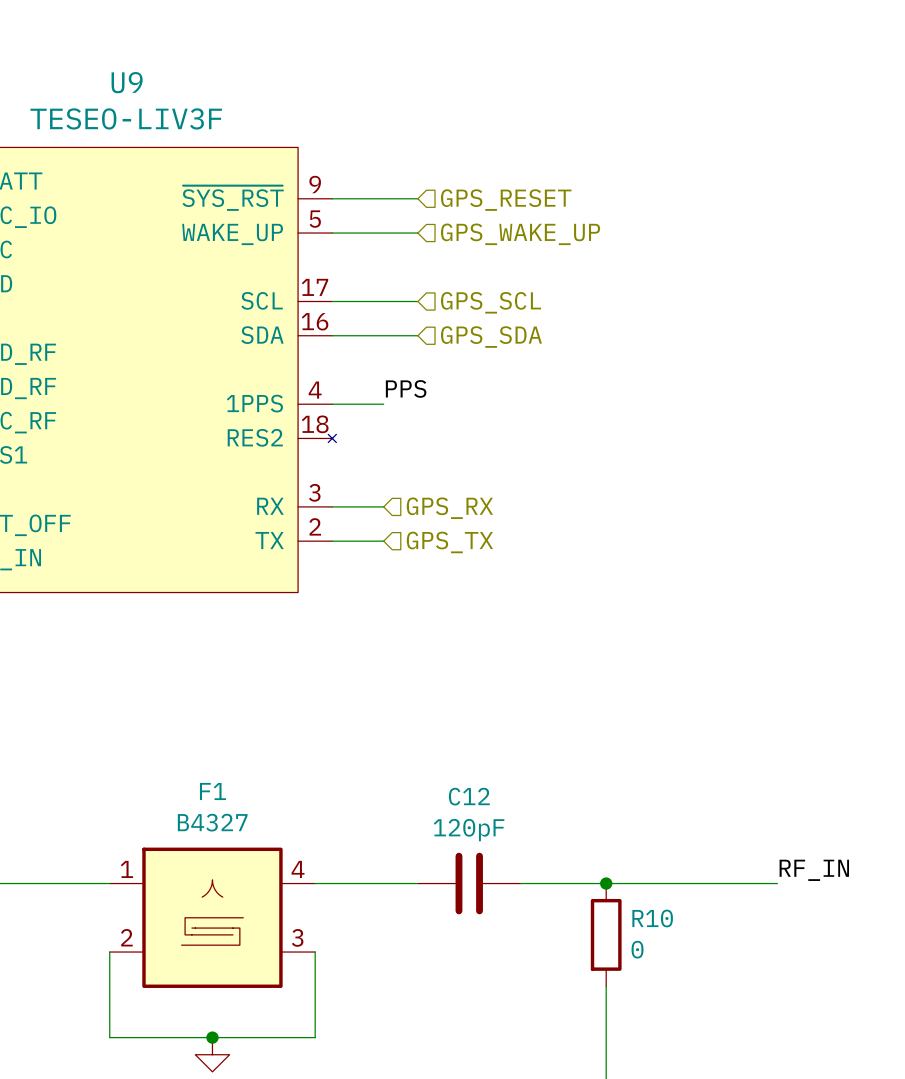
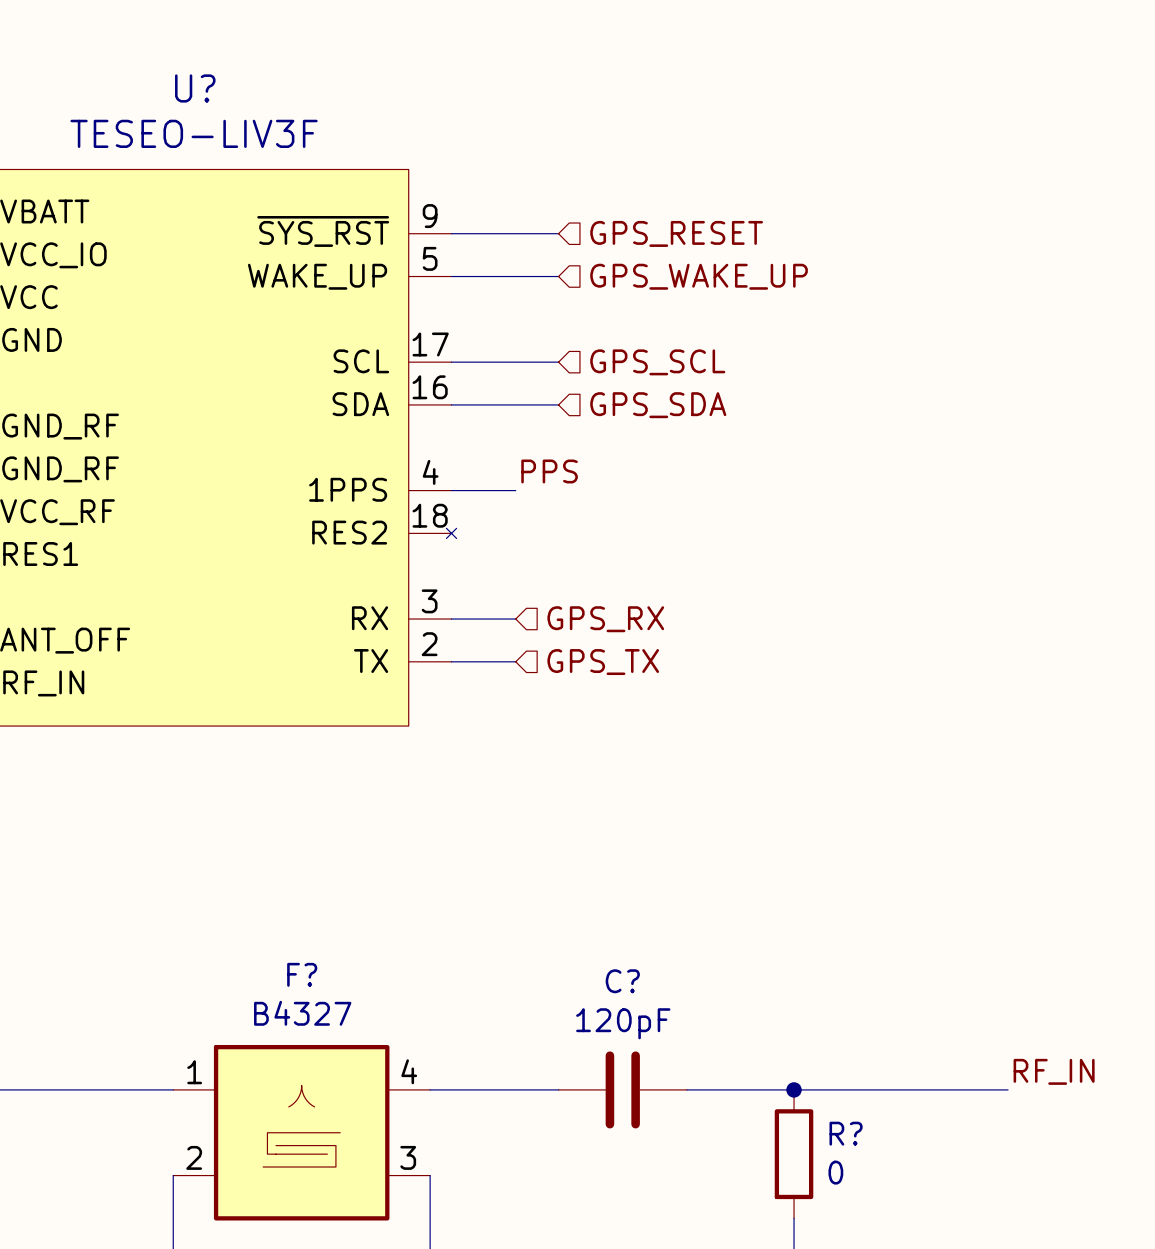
U9 name: U9 (127, 82) -> U? (195, 88)
F1 name: F1 (212, 791) -> F? (302, 974)
C12 name: C12 (469, 796) -> C? (622, 981)
R10 name: R10 (652, 918) -> R? (846, 1133)

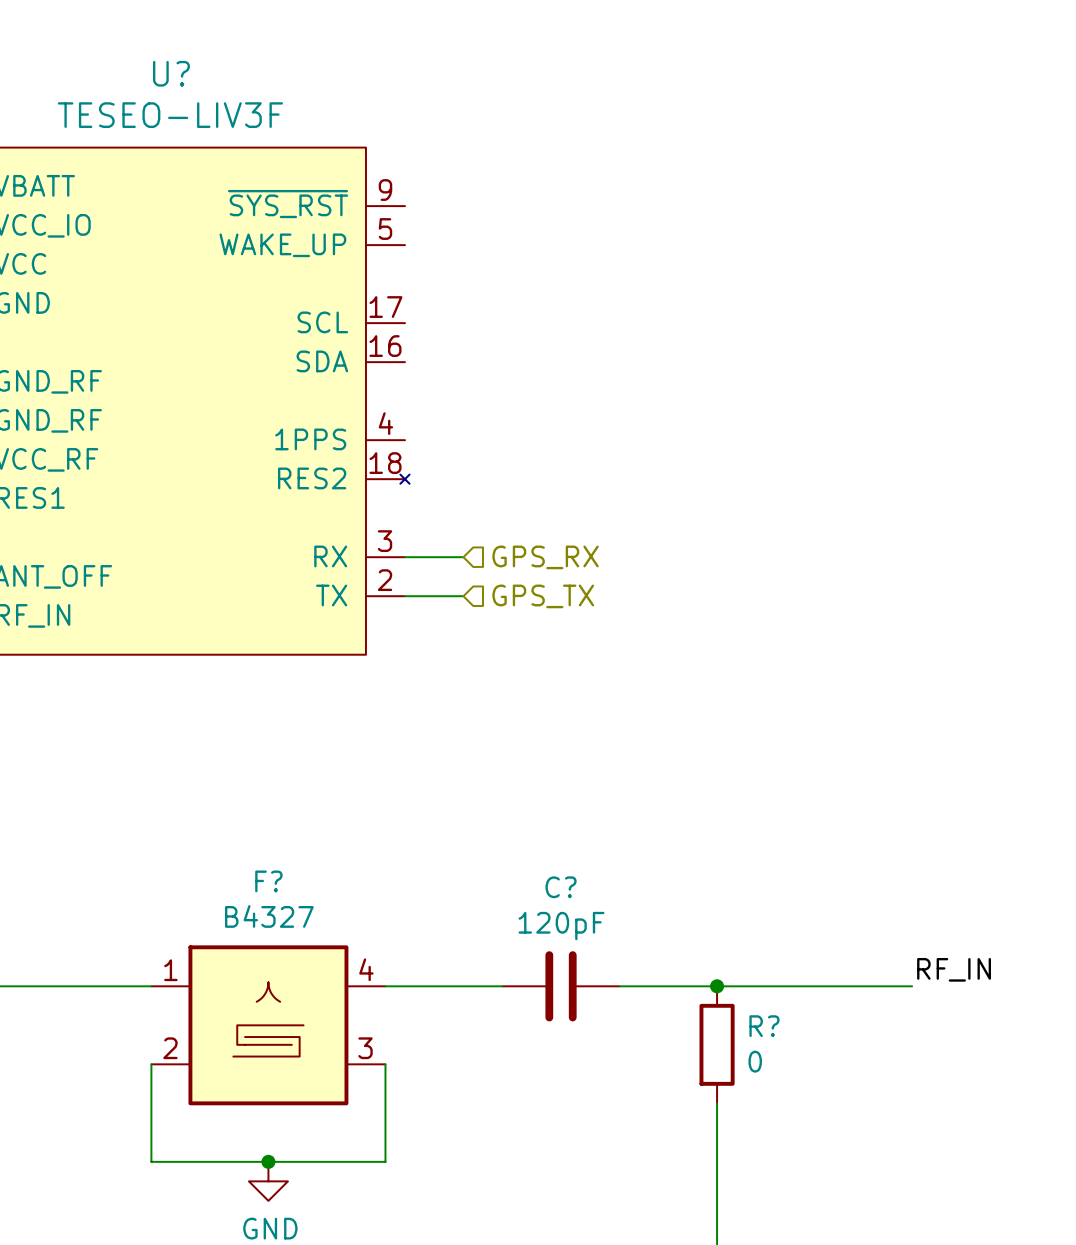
wire: (451, 233) (558, 233) -> none
hierarchical label: GPS_RESET (676, 233) -> none
wire: (451, 276) (558, 276) -> none
hierarchical label: GPS_WAKE_UP (699, 276) -> none
wire: (451, 362) (558, 362) -> none
hierarchical label: GPS_SCL (657, 362) -> none
wire: (451, 404) (558, 404) -> none
hierarchical label: GPS_SDA (658, 405) -> none
label: PPS (549, 471) -> none
wire: (451, 490) (515, 490) -> none

